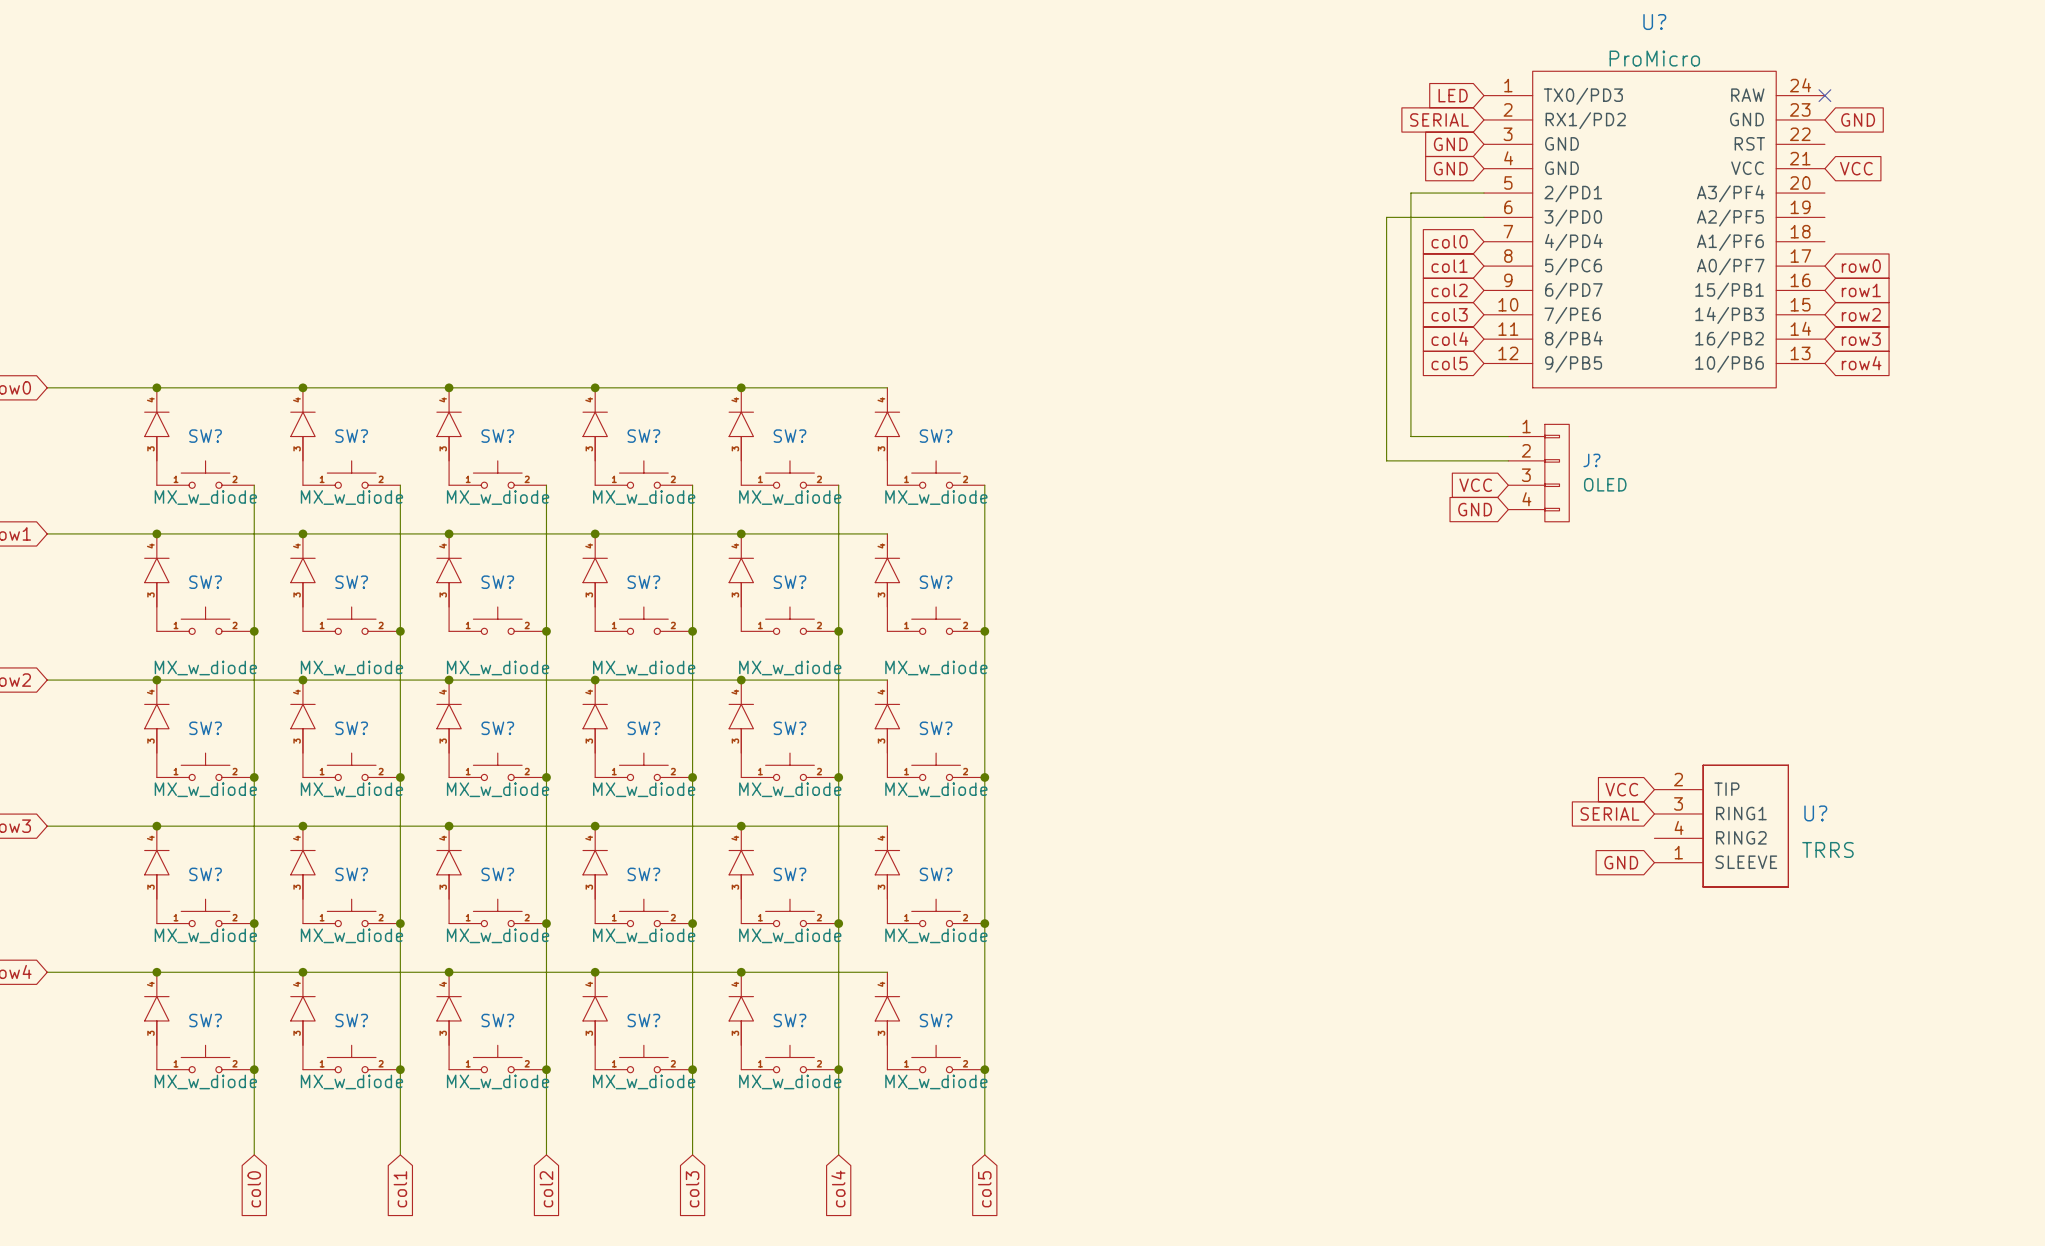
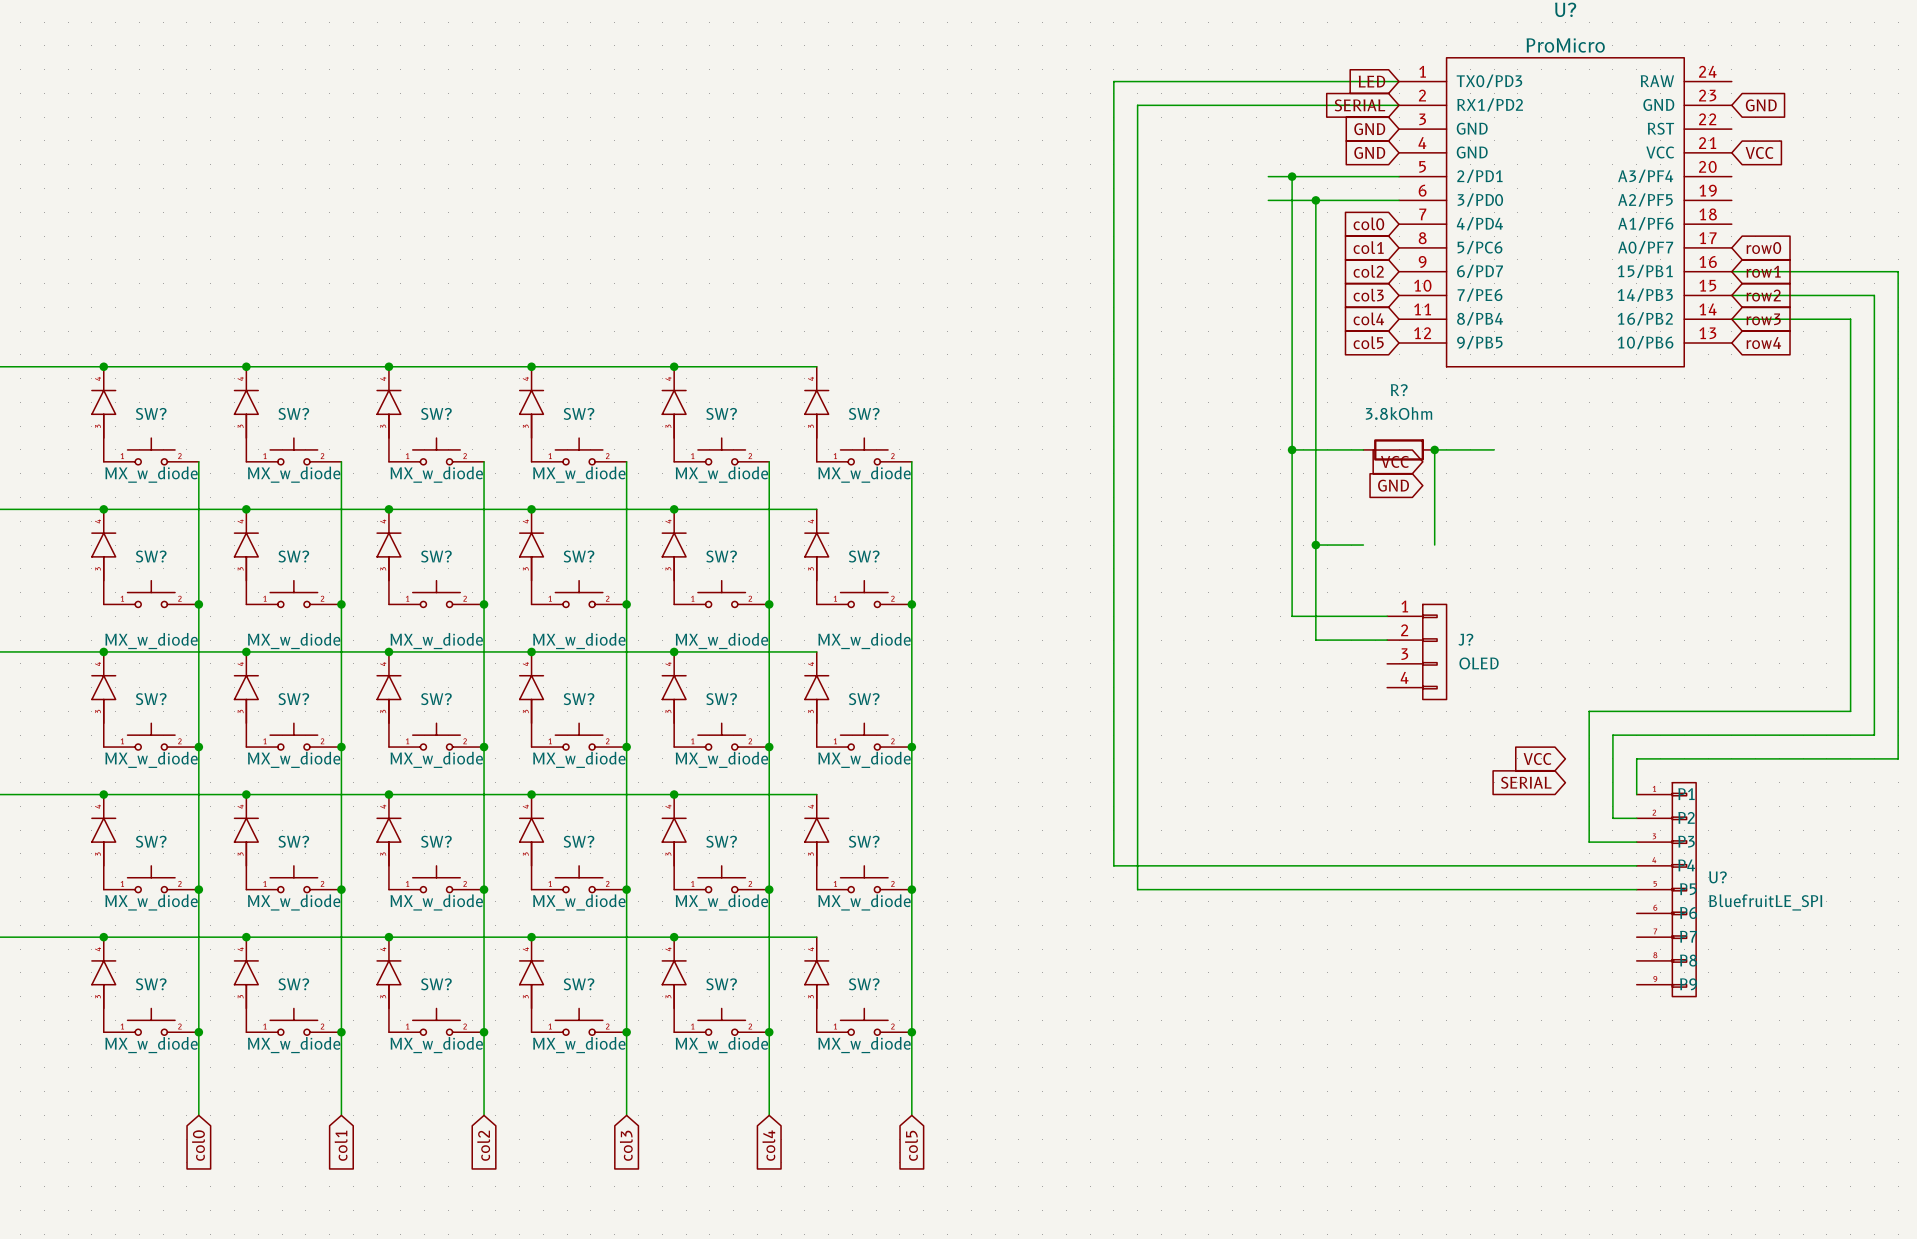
wire: none -> (1399, 81) (1113, 81) (1113, 865) (1636, 865)
no-connect mark: (1824, 95) -> none
wire: none -> (1399, 105) (1137, 105) (1137, 889) (1636, 889)
wire: none -> (1292, 176) (1292, 616) (1387, 616)
junction: none -> (1292, 176)
wire: (1410, 193) (1410, 436) (1508, 436) -> (1327, 176) (1268, 176)
wire: (1386, 217) (1386, 460) (1508, 460) -> (1303, 200) (1268, 200)
wire: none -> (1315, 200) (1315, 640) (1387, 640)
junction: none -> (1315, 200)
wire: none -> (1731, 271) (1898, 271) (1898, 758) (1636, 758) (1636, 794)
wire: none -> (1731, 295) (1874, 295) (1874, 735) (1612, 735) (1612, 818) (1636, 818)
wire: none -> (1731, 319) (1850, 319) (1850, 711) (1589, 711) (1589, 842) (1636, 842)
wire: none -> (1292, 449) (1363, 449)
junction: none -> (1292, 449)
R?: none -> 3.8kOhm (1399, 449)
junction: none -> (1434, 449)
J? position: (1538, 473) -> (1416, 651)
wire: none -> (1494, 449) (1434, 449) (1434, 545)
wire: none -> (1315, 545) (1363, 545)
junction: none -> (1315, 545)
U?: TRRS (1721, 826) -> none
global label: GND (1621, 862) -> none
U?: none -> BluefruitLE_SPI (1666, 889)

